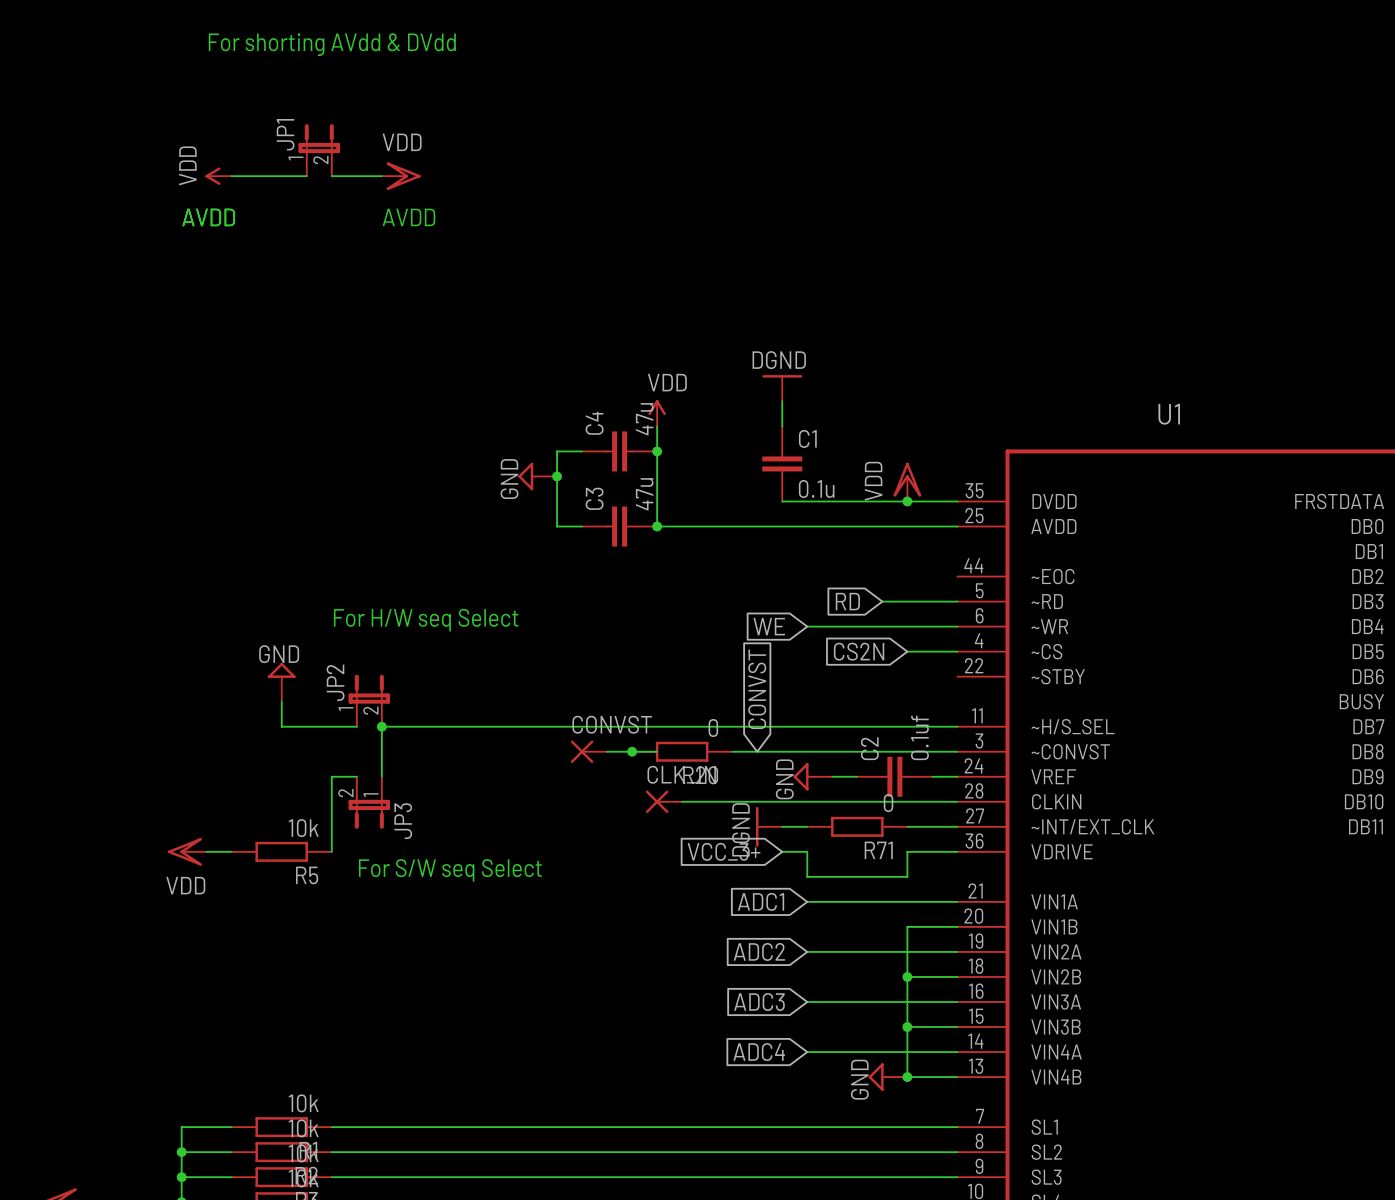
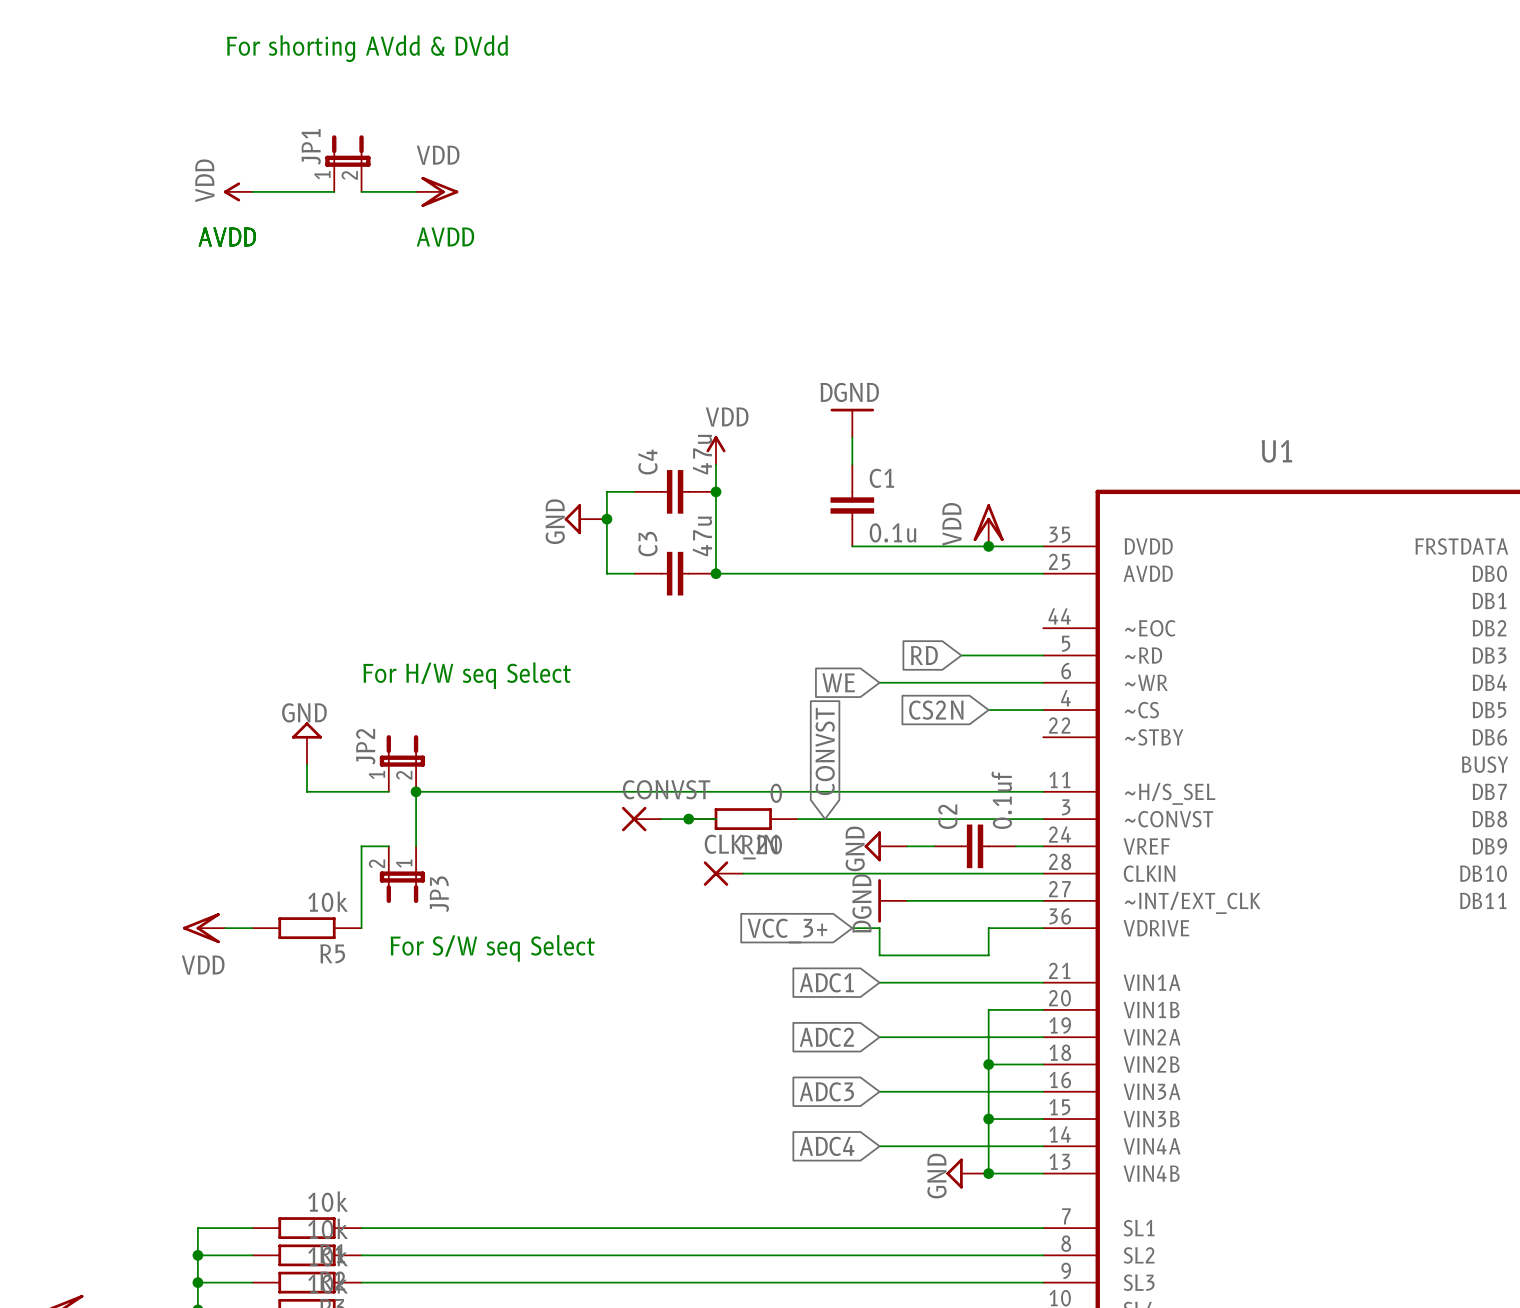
power symbol position: DGND (769, 826) -> DGND (892, 900)
wire: (782, 826) (807, 826) -> none
wire: none -> (906, 900) (988, 900)
R71: 0 (857, 826) -> none

